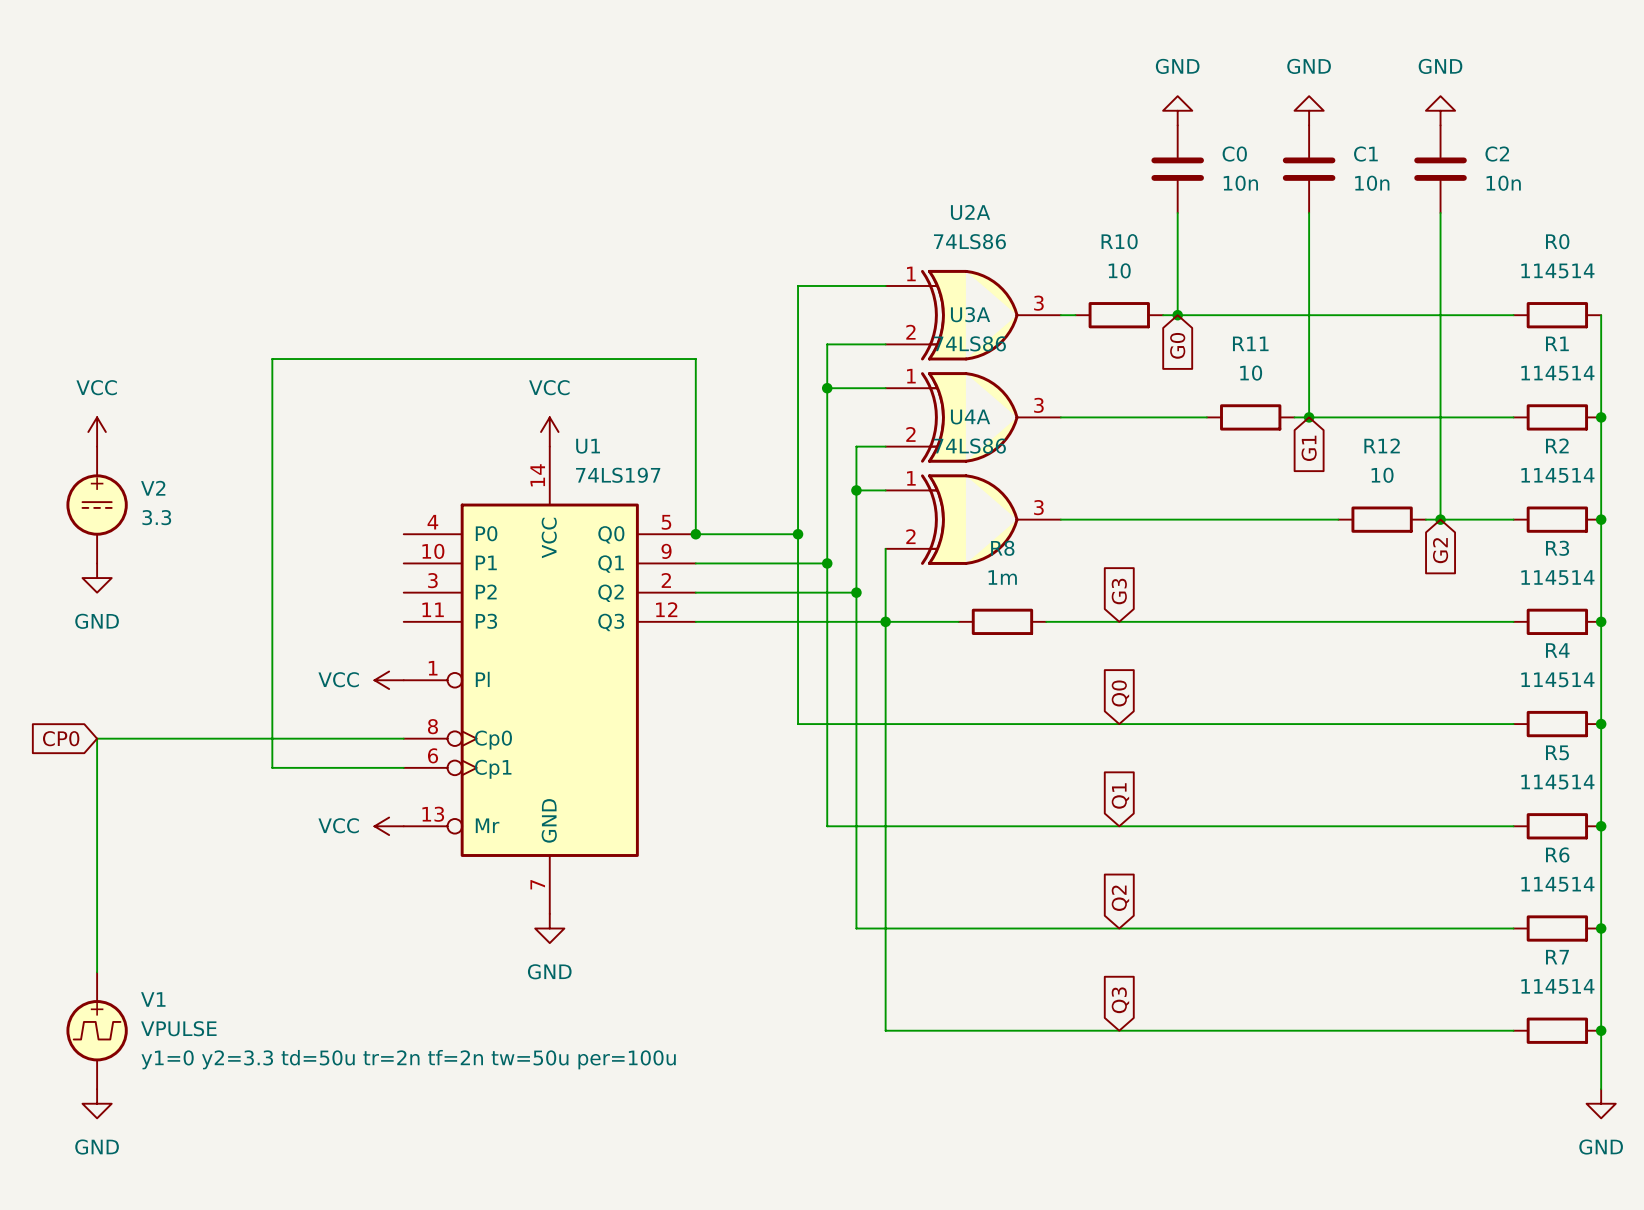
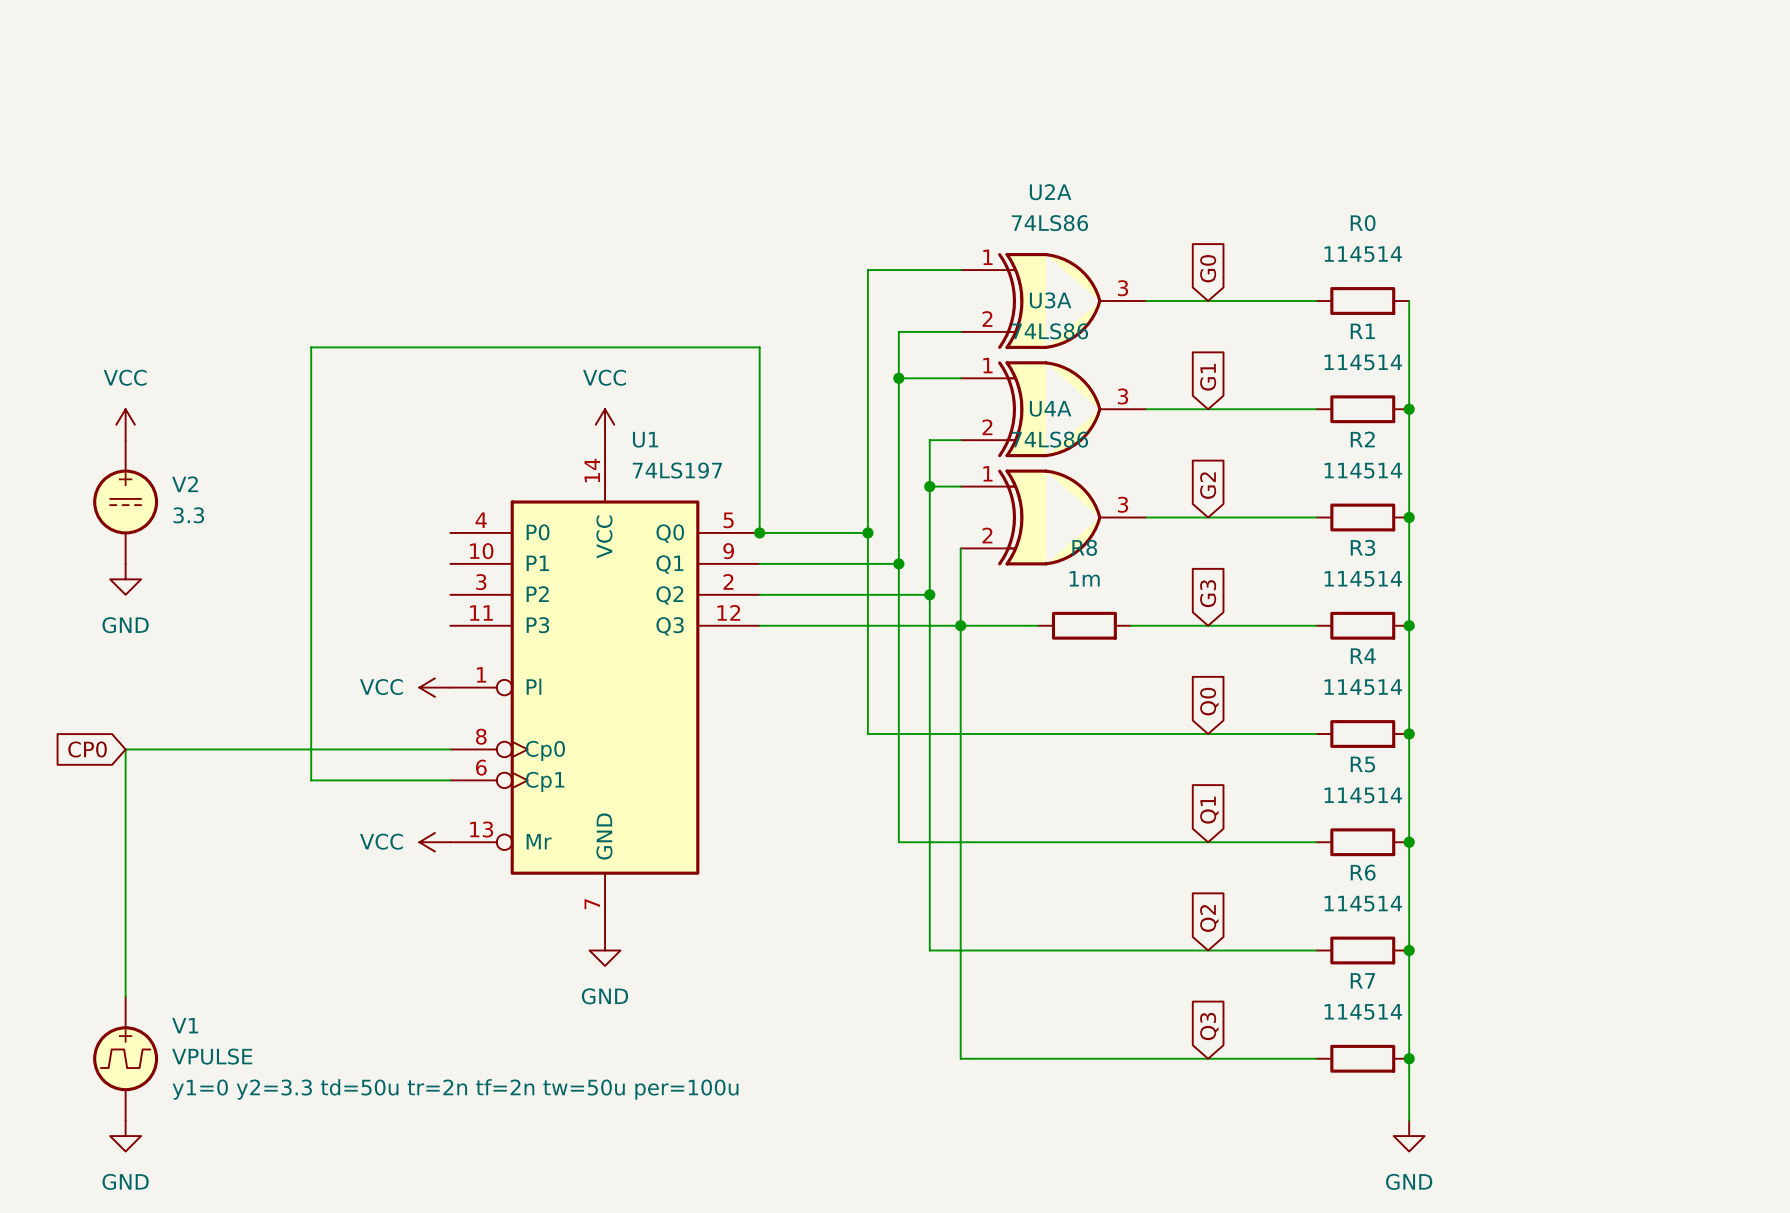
power symbol: GND (1177, 110) -> none
power symbol: GND (1309, 110) -> none
power symbol: GND (1440, 110) -> none
C0: 10n (1177, 169) -> none
C1: 10n (1309, 169) -> none
C2: 10n (1440, 169) -> none
wire: (1177, 212) (1177, 315) -> none
wire: (1309, 212) (1309, 315) -> none
wire: (1440, 212) (1440, 519) -> none
wire: none -> (1161, 300) (1254, 300)
R10: 10 (1119, 315) -> none
junction: (1177, 315) -> none
wire: (1221, 315) (1513, 315) -> none
R0 position: (1557, 315) -> (1362, 300)
wire: (1601, 315) (1601, 1089) -> none
global label rotation: 0° (1177, 345) -> 180° (1208, 268)
global label position: G0 (1177, 345) -> G0 (1208, 268)
R11: 10 (1250, 417) -> none
wire: (1294, 417) (1513, 417) -> none
wire: none -> (1409, 409) (1409, 1120)
R1 position: (1557, 417) -> (1362, 409)
junction: (1601, 417) -> none
global label rotation: 0° (1309, 448) -> 180° (1208, 377)
global label position: G1 (1309, 448) -> G1 (1208, 377)
global label: none -> G2 (1208, 485)
wire: (1221, 519) (1338, 519) -> none
junction: none -> (1409, 517)
R12: 10 (1382, 519) -> none
wire: (1425, 519) (1513, 519) -> none
junction: (1440, 519) -> none
R2 position: (1557, 519) -> (1362, 517)
junction: (1601, 519) -> none
global label: G2 (1440, 550) -> none
wire: (1221, 621) (1513, 621) -> none
junction: none -> (1409, 625)
R3 position: (1557, 621) -> (1362, 625)
junction: (1601, 621) -> none
wire: (1221, 724) (1513, 724) -> none
junction: none -> (1409, 734)
R4 position: (1557, 724) -> (1362, 734)
junction: (1601, 724) -> none
wire: (1221, 826) (1513, 826) -> none
junction: none -> (1409, 842)
R5 position: (1557, 826) -> (1362, 842)
junction: (1601, 826) -> none
wire: (1221, 928) (1513, 928) -> none
junction: none -> (1409, 950)
R6 position: (1557, 928) -> (1362, 950)
junction: (1601, 928) -> none
wire: (1221, 1030) (1513, 1030) -> none
junction: none -> (1409, 1058)
R7 position: (1557, 1030) -> (1362, 1058)
junction: (1601, 1030) -> none
power symbol: none -> GND (1409, 1136)
power symbol: GND (1601, 1103) -> none

